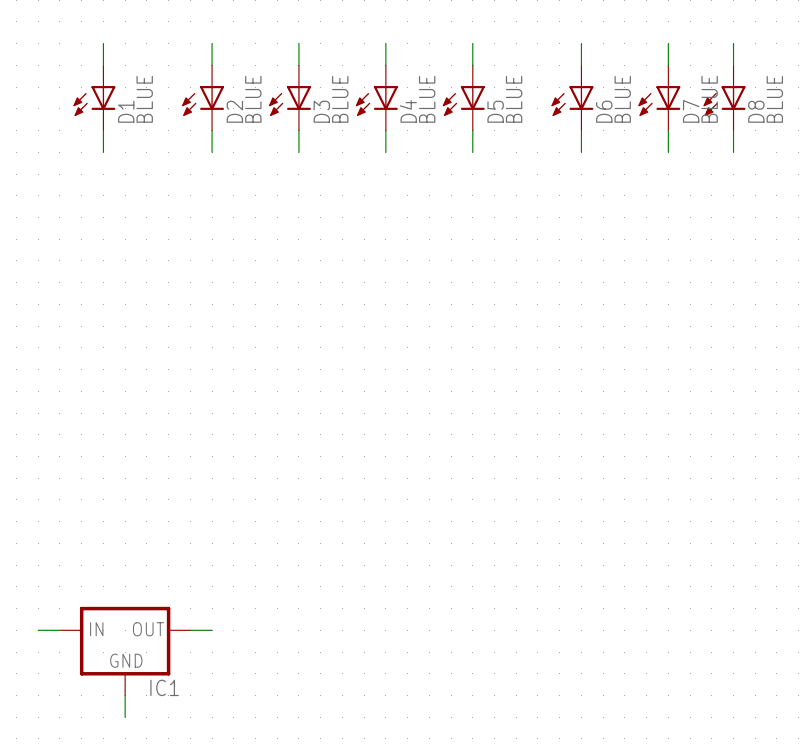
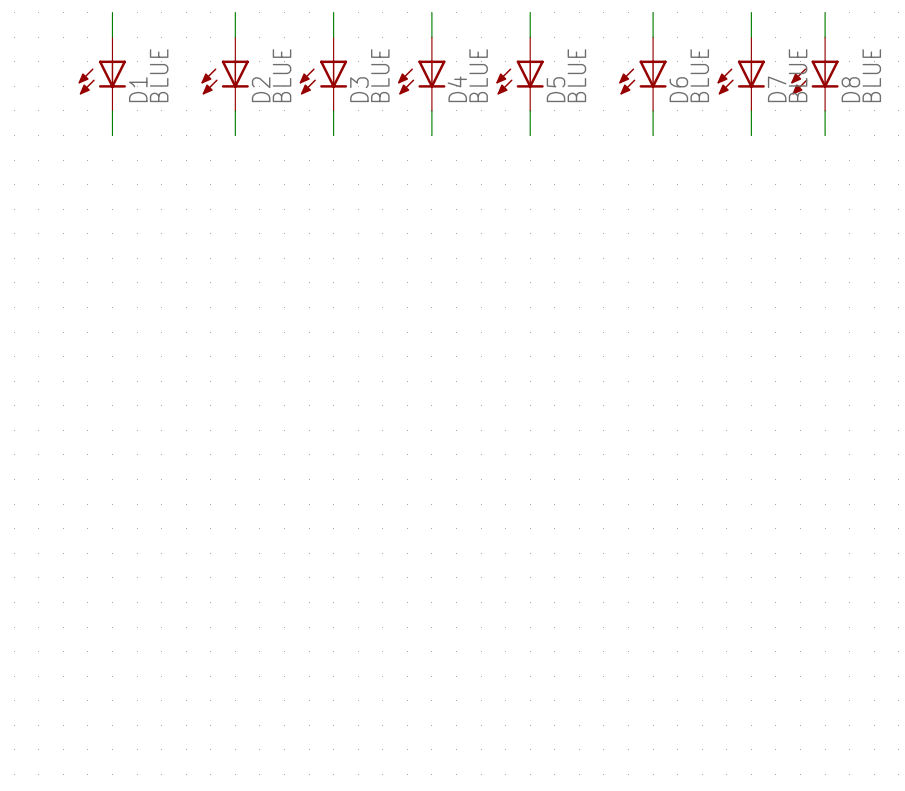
wire: (38, 630) (59, 630) -> none
wire: (190, 630) (212, 630) -> none
IC1: (125, 651) -> none
wire: (125, 695) (125, 717) -> none

